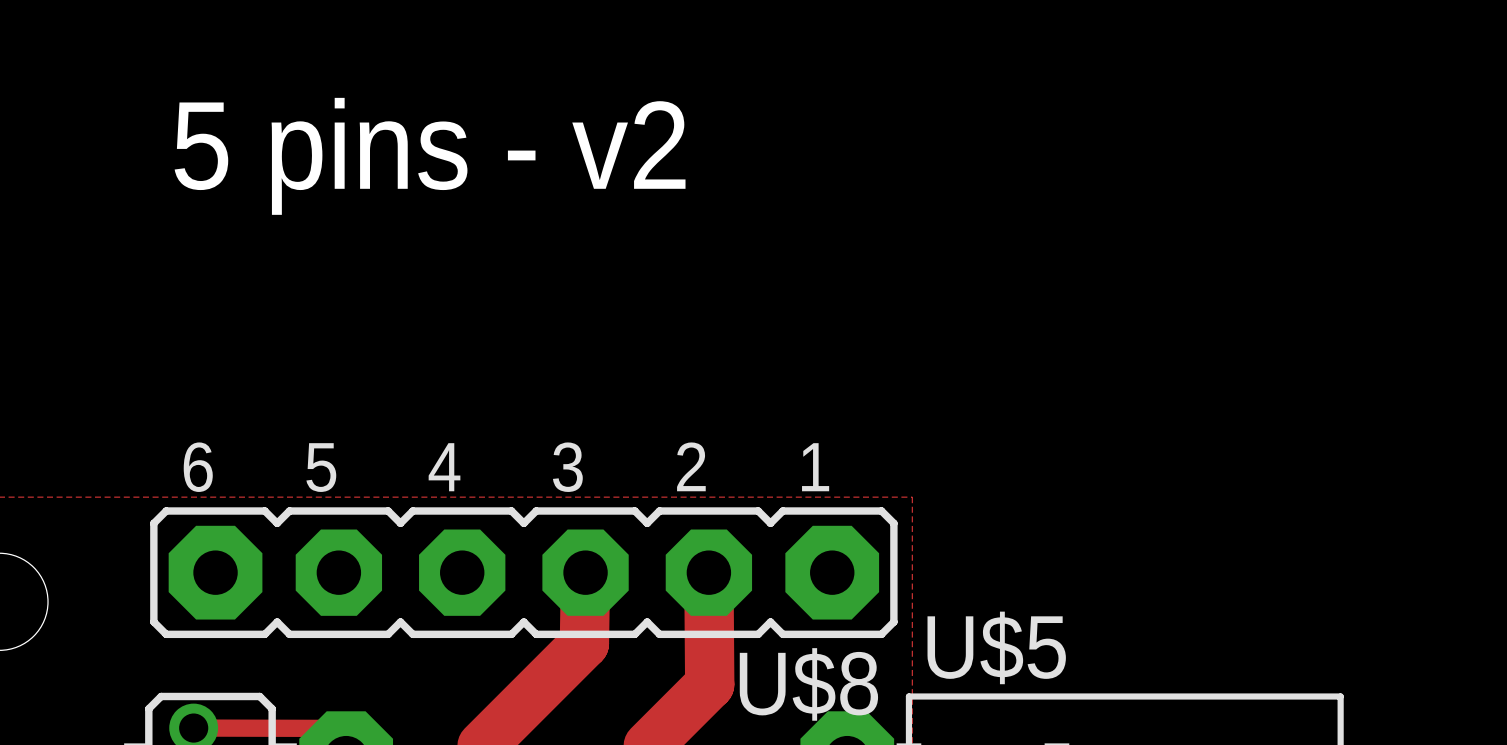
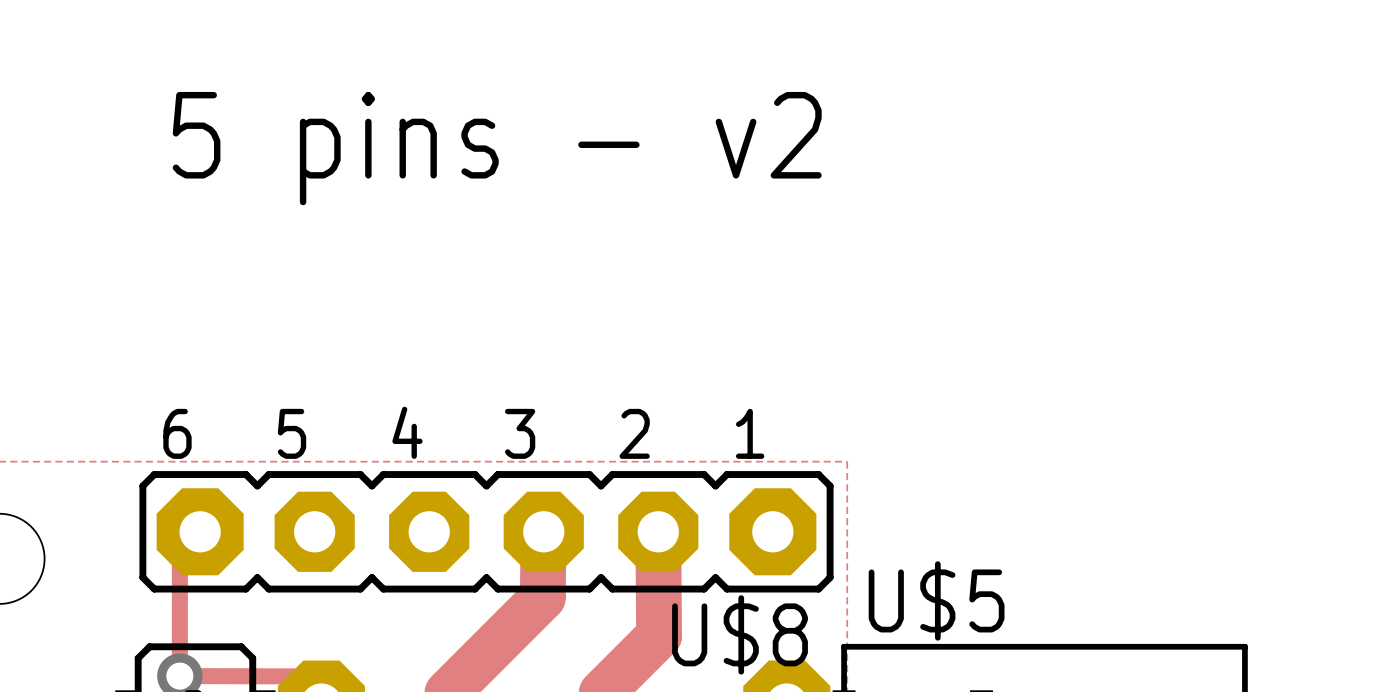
track: none -> (200, 531) (179, 552) (179, 676)

